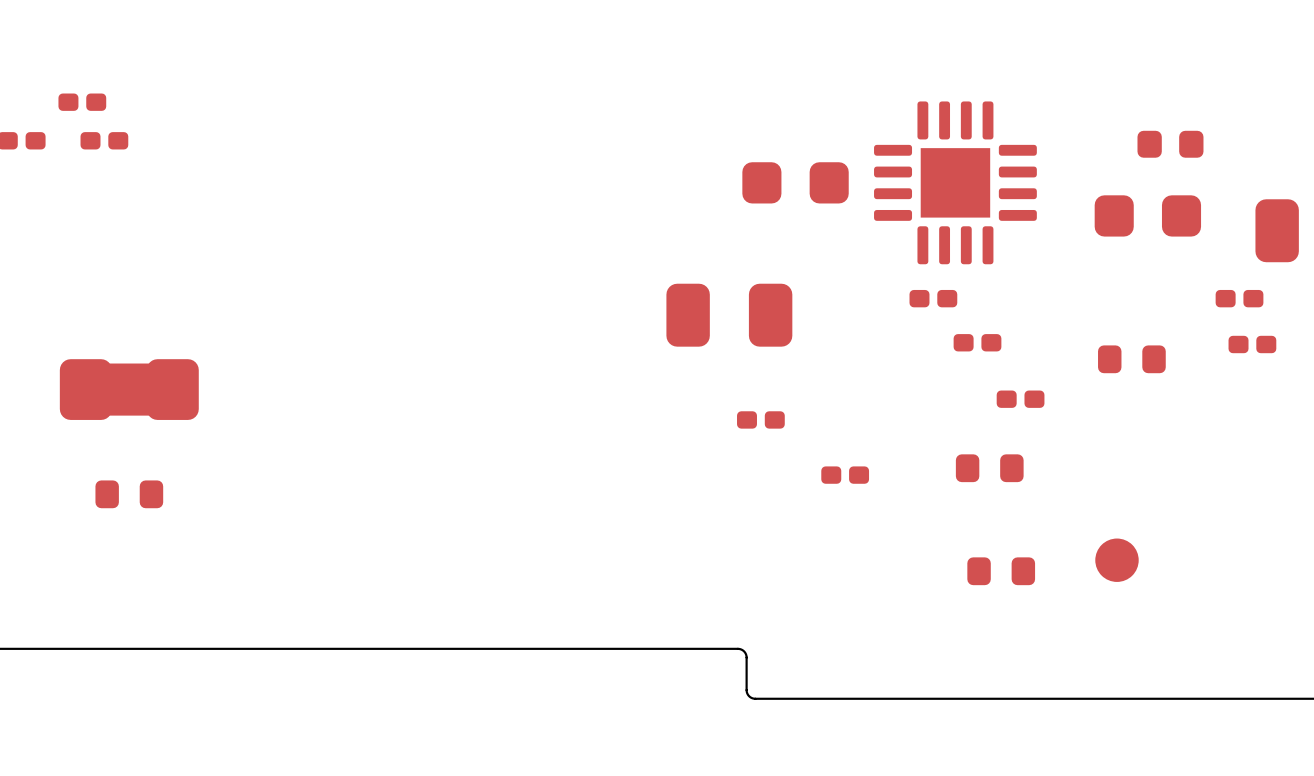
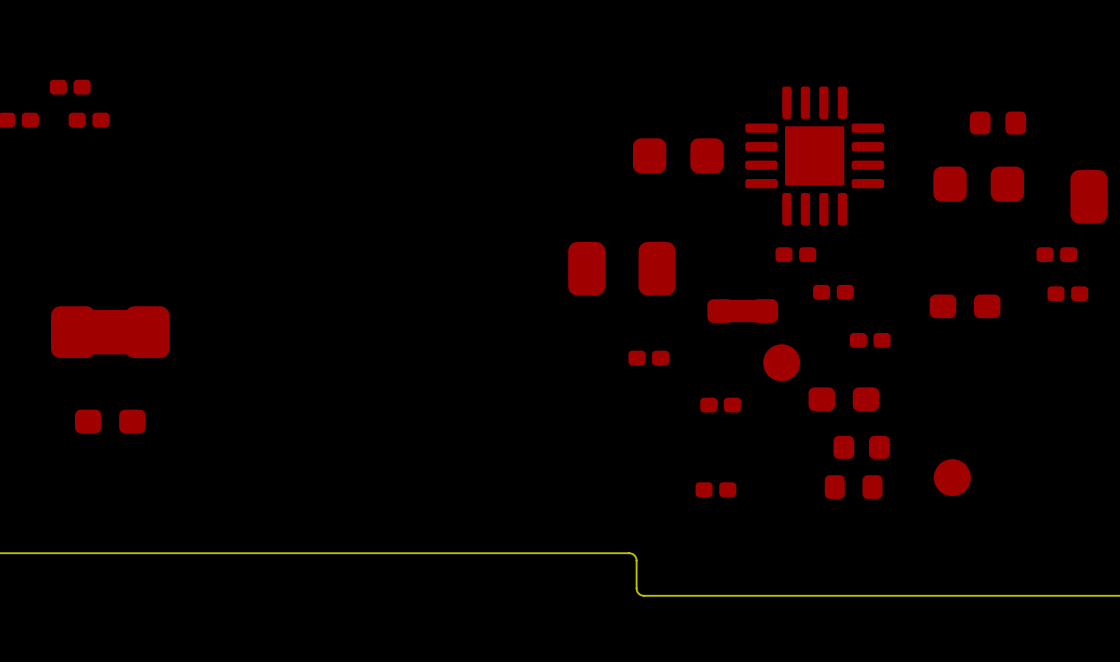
part footprint: [1098, 345, 1166, 374] -> [929, 294, 1001, 319]
part: none -> (742, 311)
part: none -> (781, 362)
part footprint: [955, 454, 1024, 483] -> [808, 387, 880, 412]
part footprint: [95, 480, 164, 509] -> [74, 409, 146, 434]
part: none -> (861, 447)
part: none -> (715, 489)

